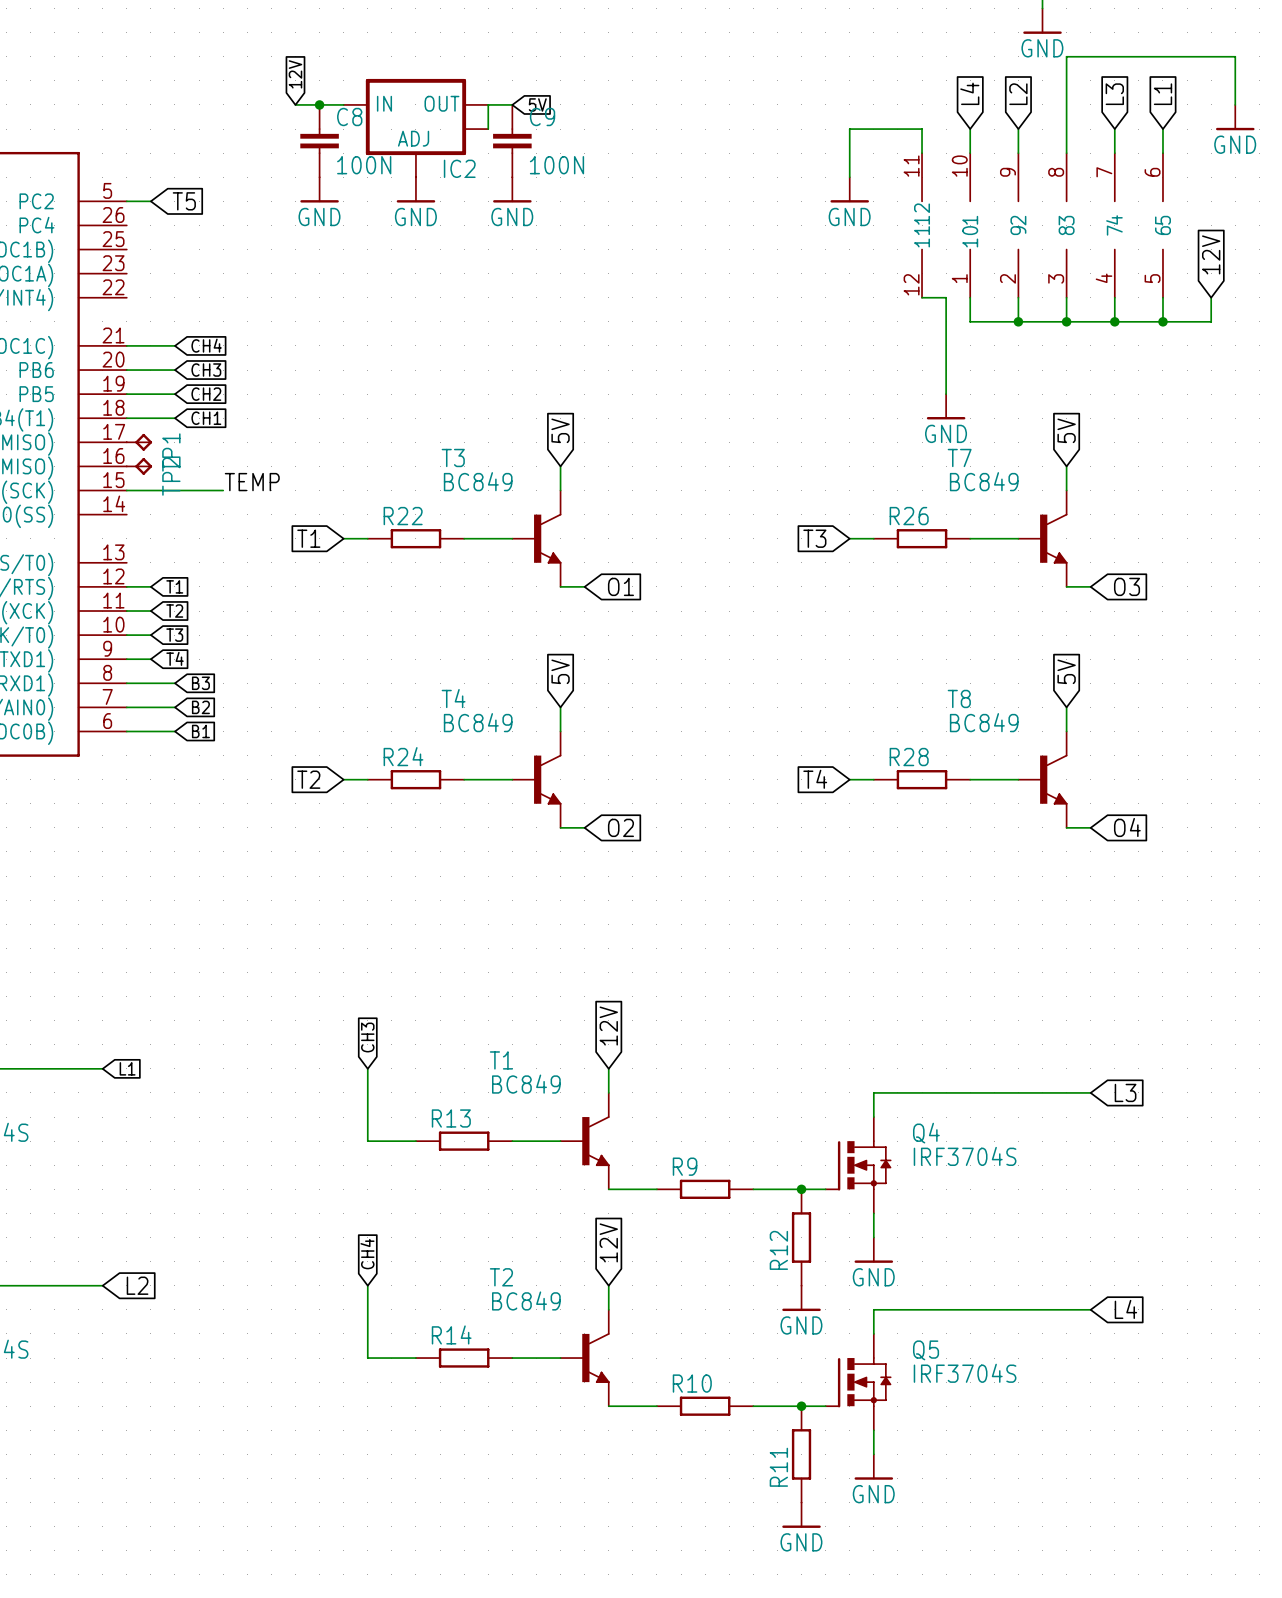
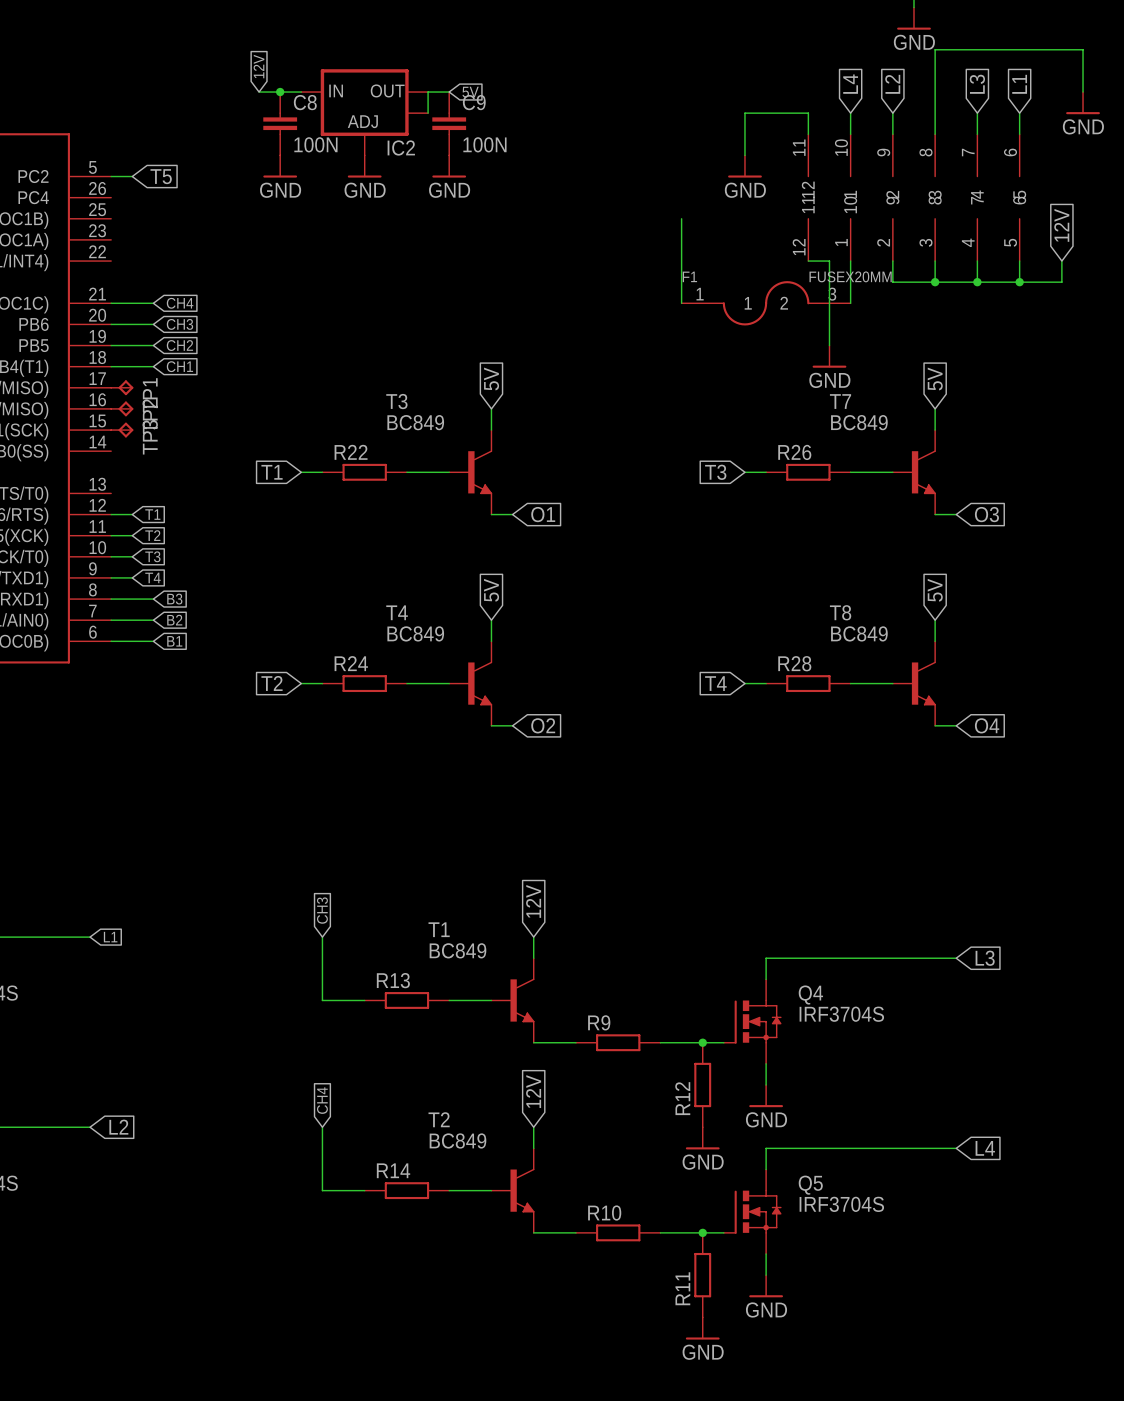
wire: none -> (681, 218) (681, 303)
wire: (970, 321) (1018, 321) -> (850, 282) (850, 303)
junction: (1018, 321) -> none
F1: none -> FUSEX20MM (766, 303)
label: TEMP (252, 482) -> none
wire: (126, 490) (223, 490) -> none
TP3: none -> (122, 430)

